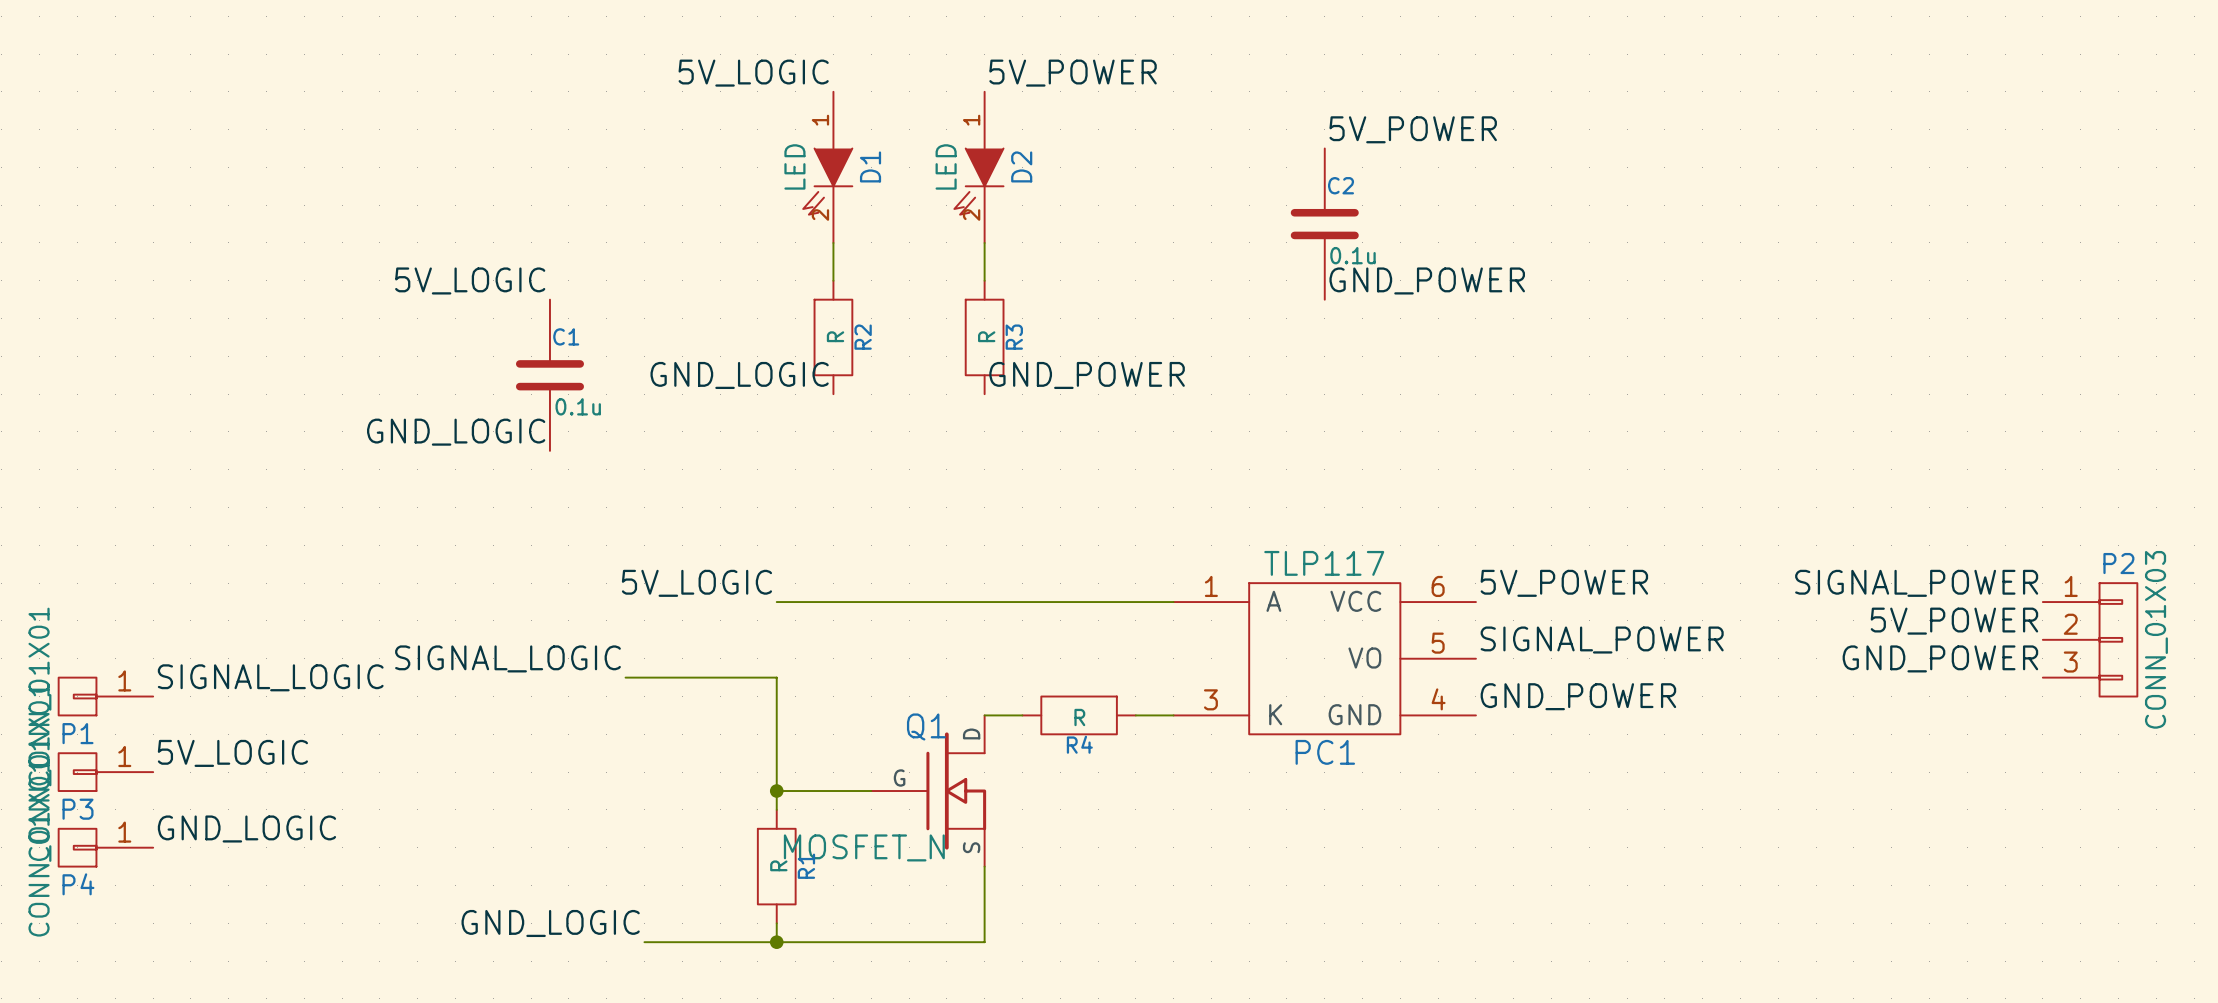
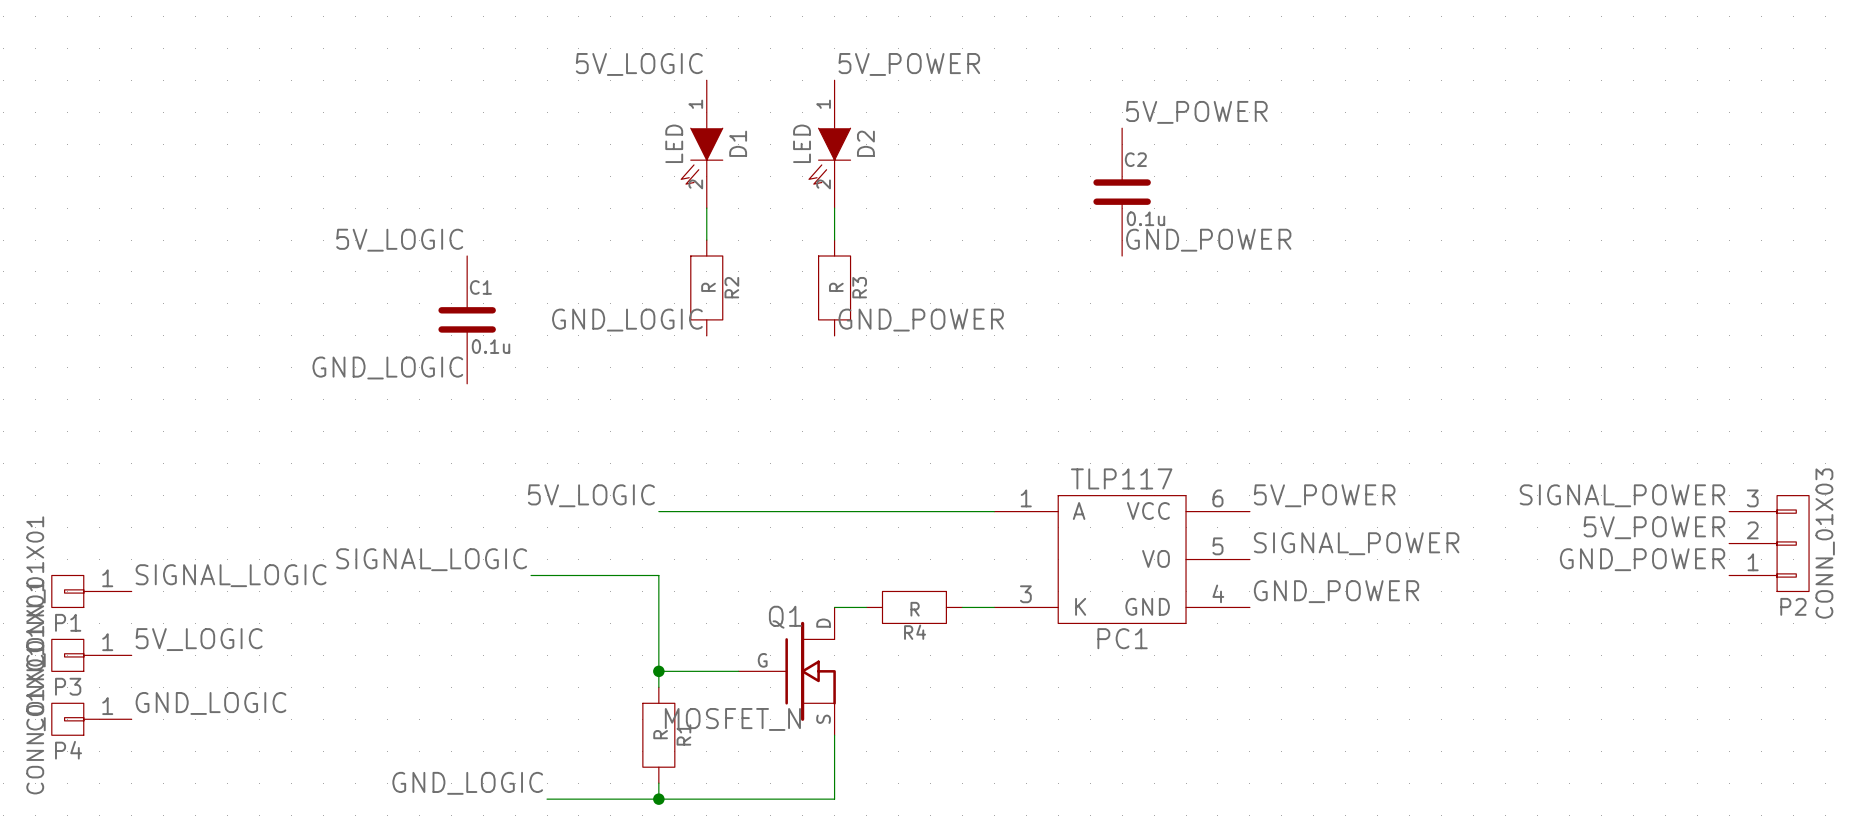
P2 flip: as is (2118, 639) -> up-down (1793, 543)

